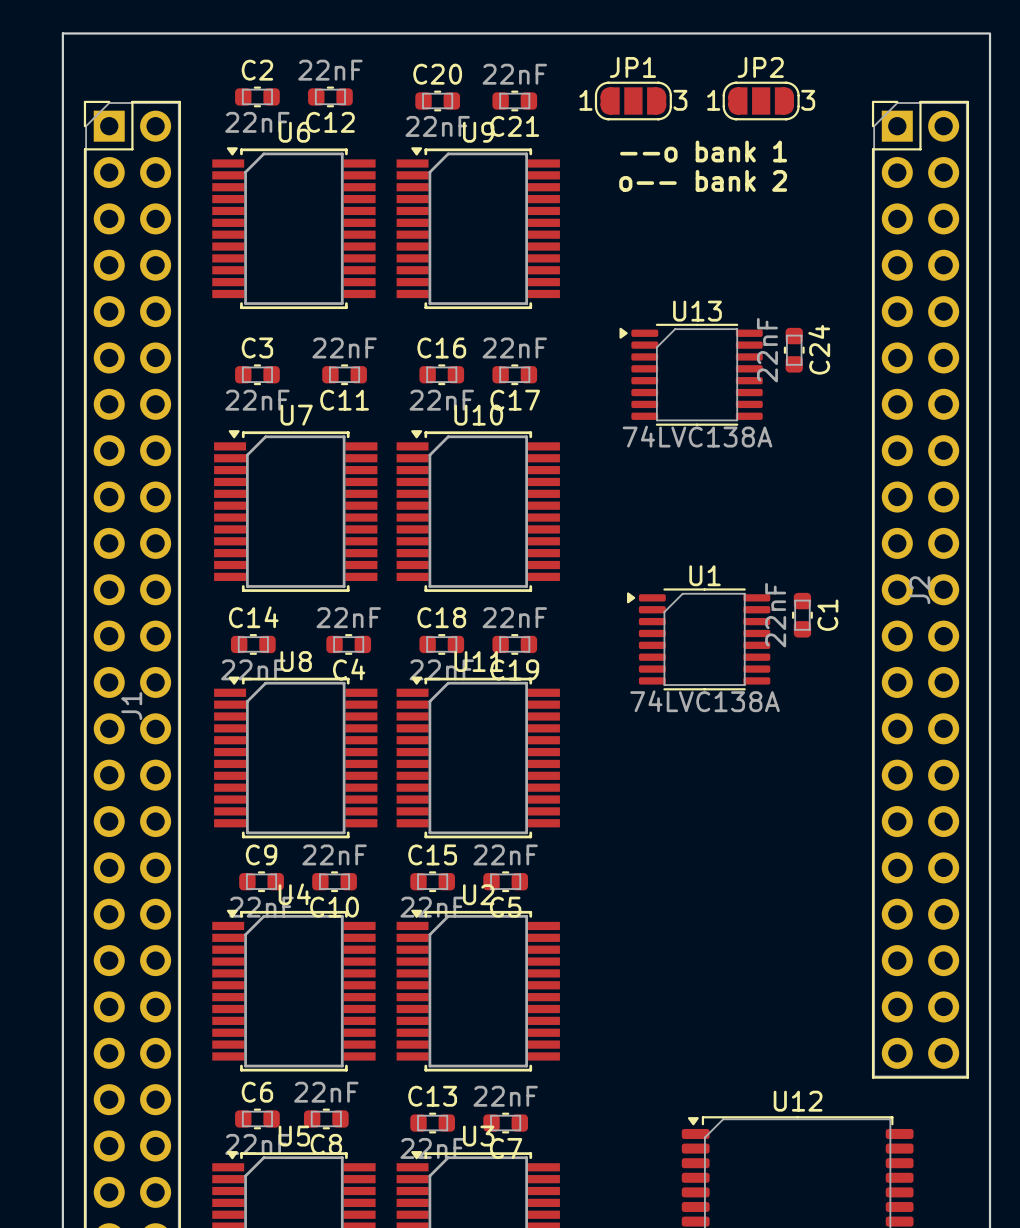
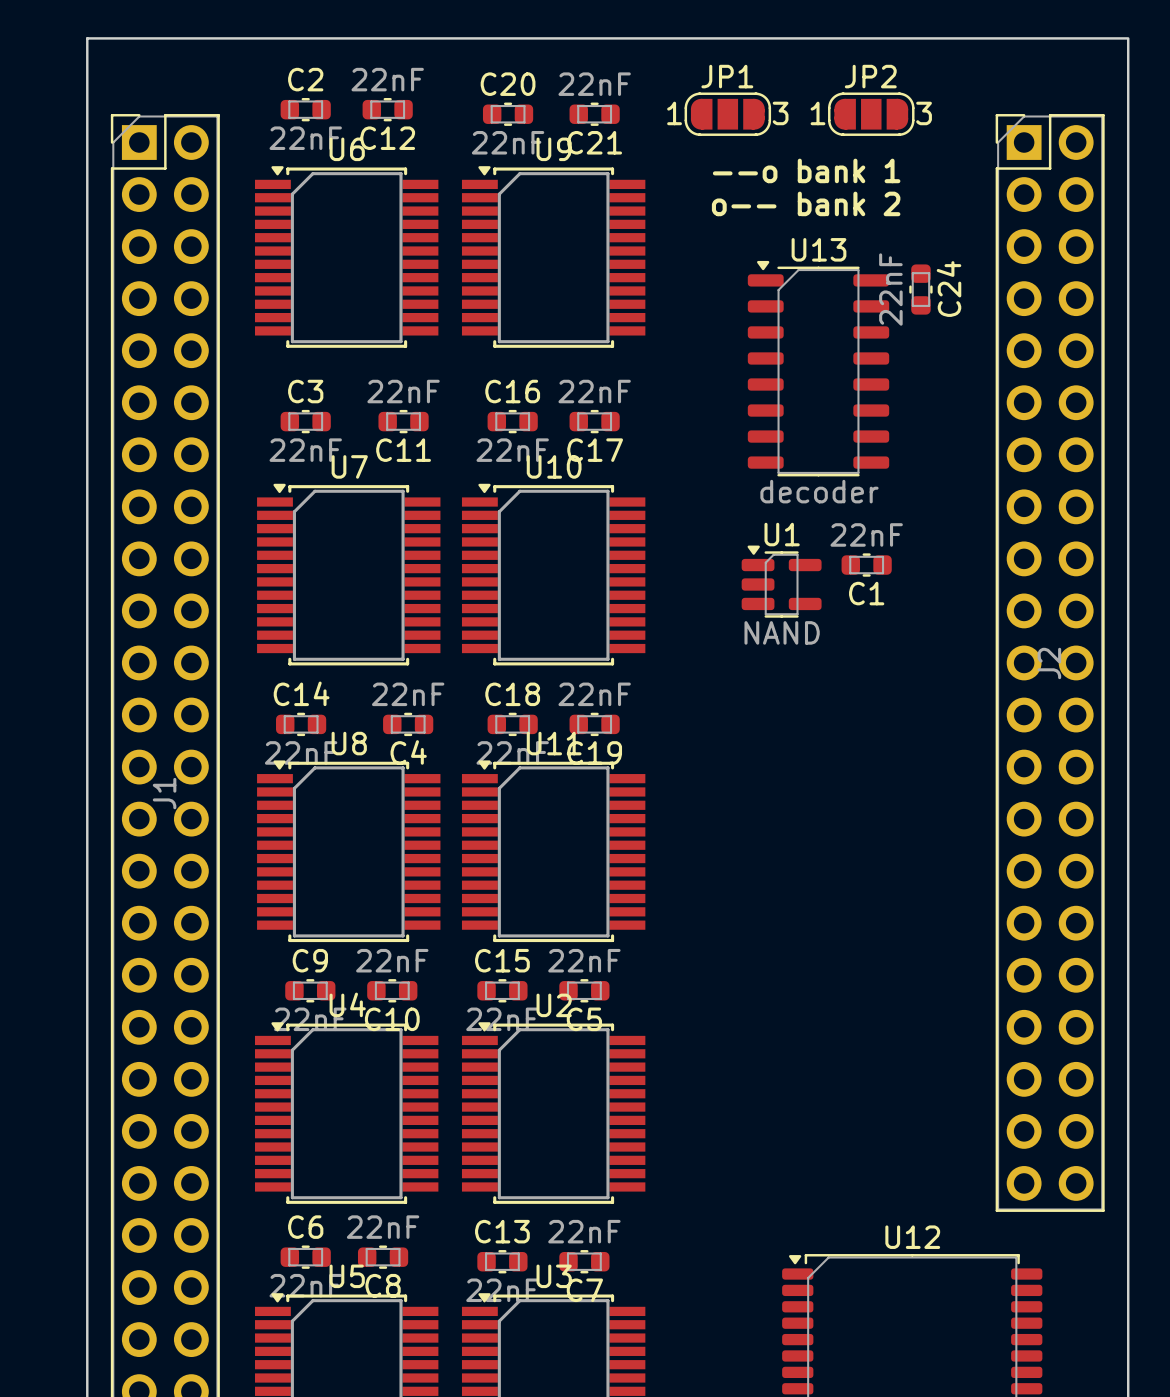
U13 name position: U13 (697, 311) -> U13 (818, 249)
U13 footprint: [619, 323, 763, 426] -> [747, 260, 890, 477]
C24 position: (794, 350) -> (920, 289)
U13 value: 74LVC138A (697, 436) -> decoder (819, 491)
U1 footprint: [627, 588, 771, 691] -> [741, 545, 822, 618]
C1 rotation: 0° (802, 615) -> 90° clockwise (866, 565)
C1 position: (802, 615) -> (866, 565)
U1 value: 74LVC138A (705, 701) -> NAND (782, 632)

